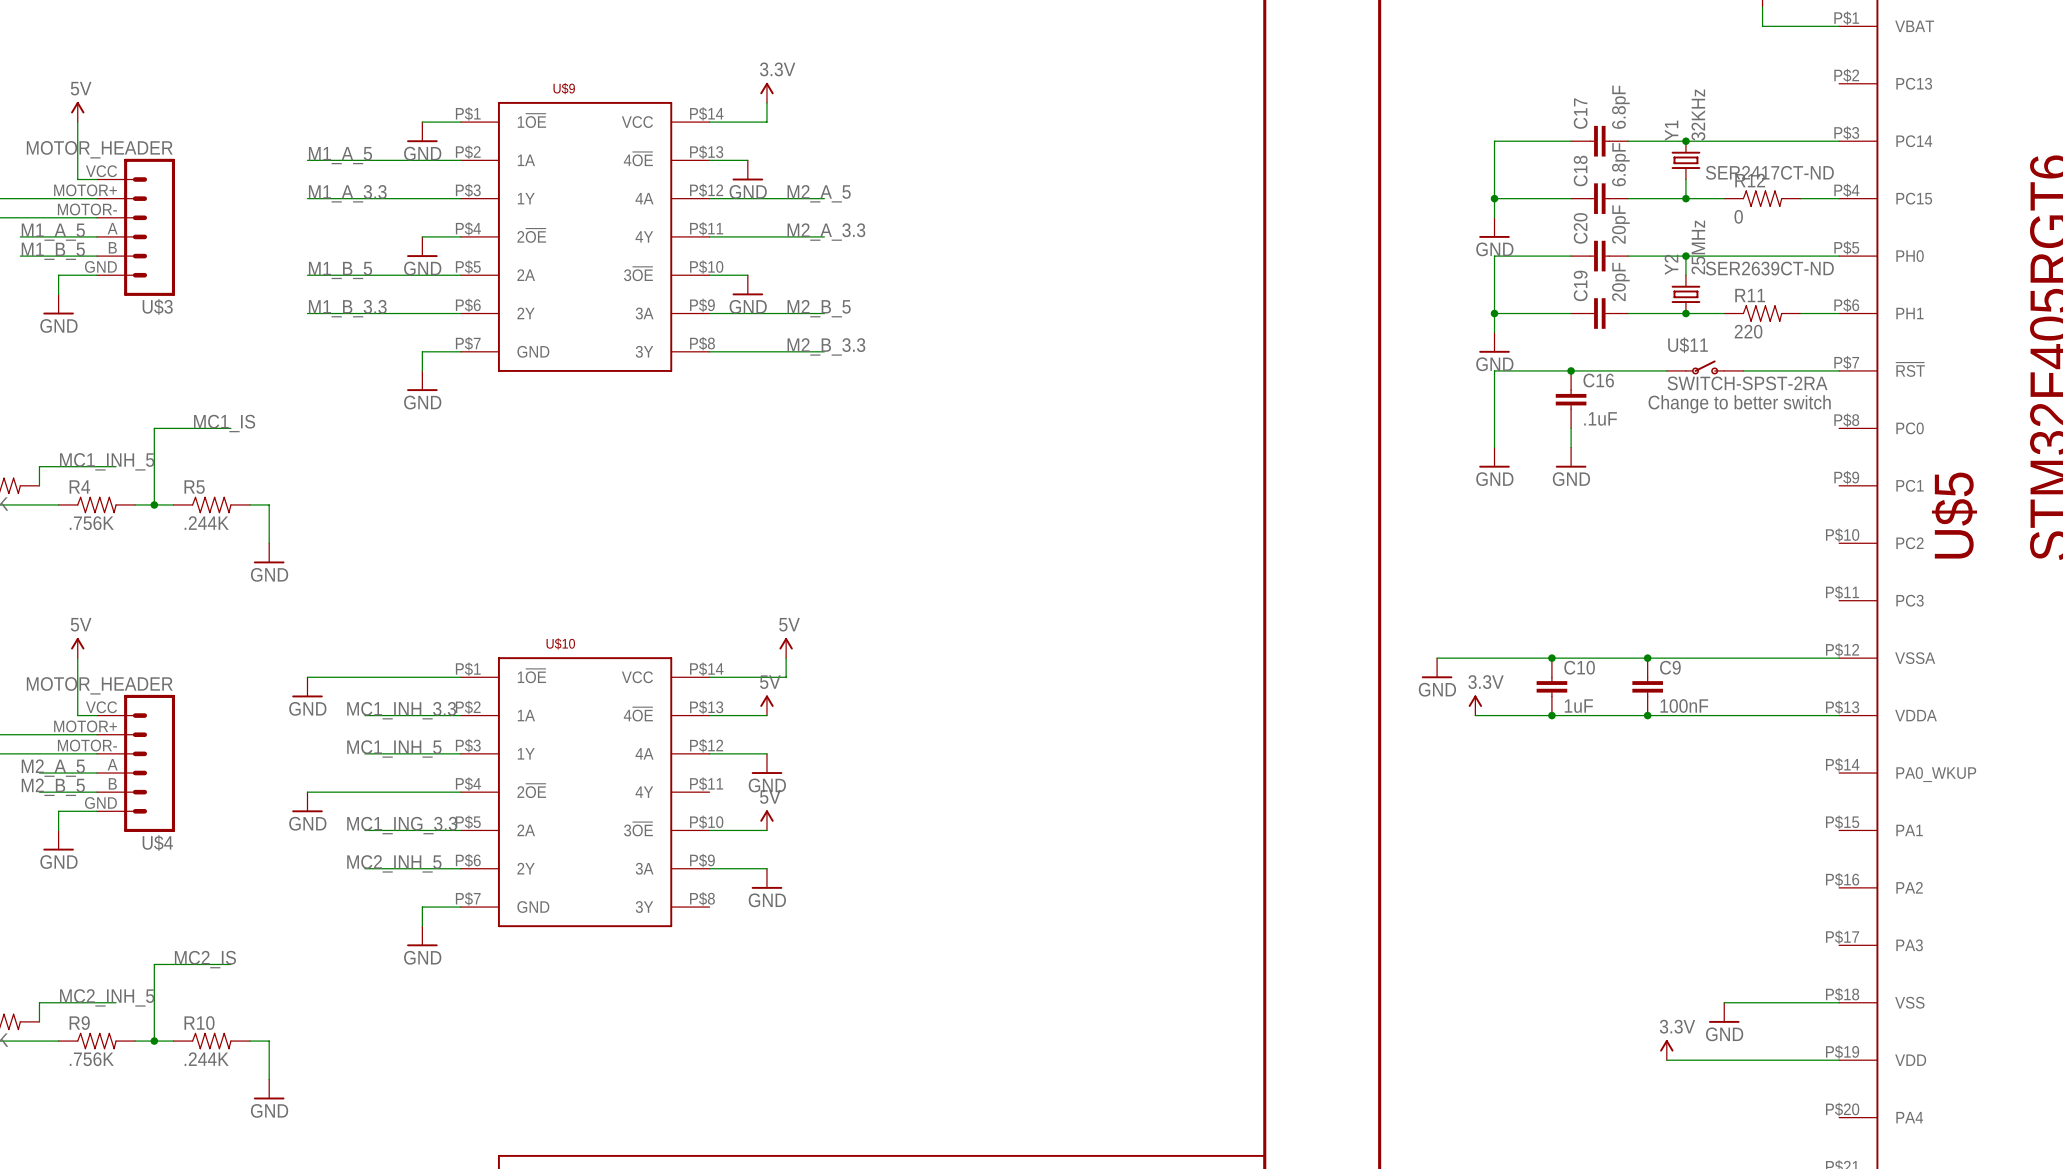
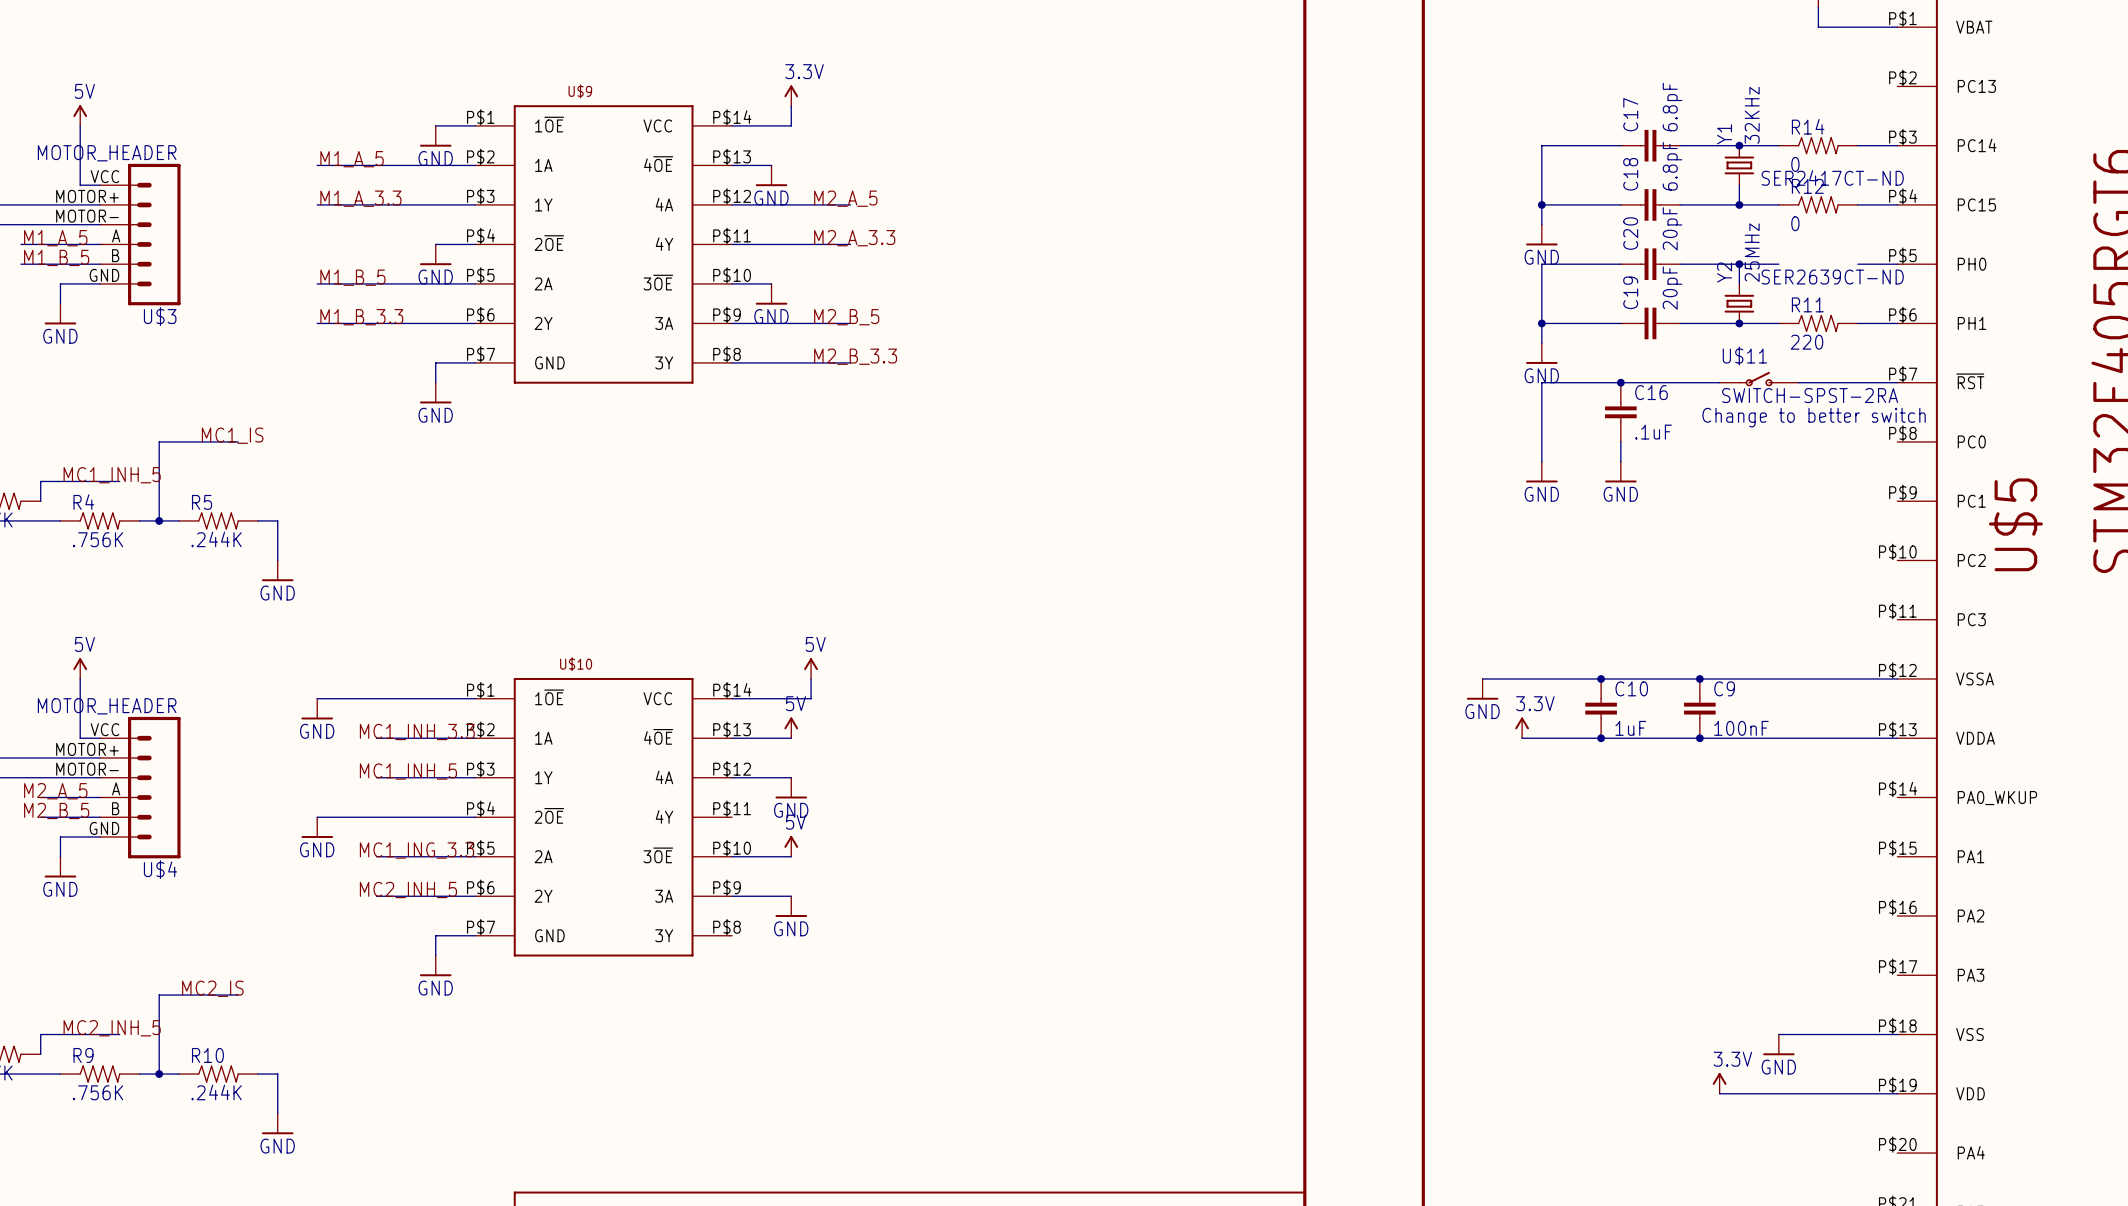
R14: none -> 0 (1818, 145)
wire: (1724, 256) (1800, 256) -> none

